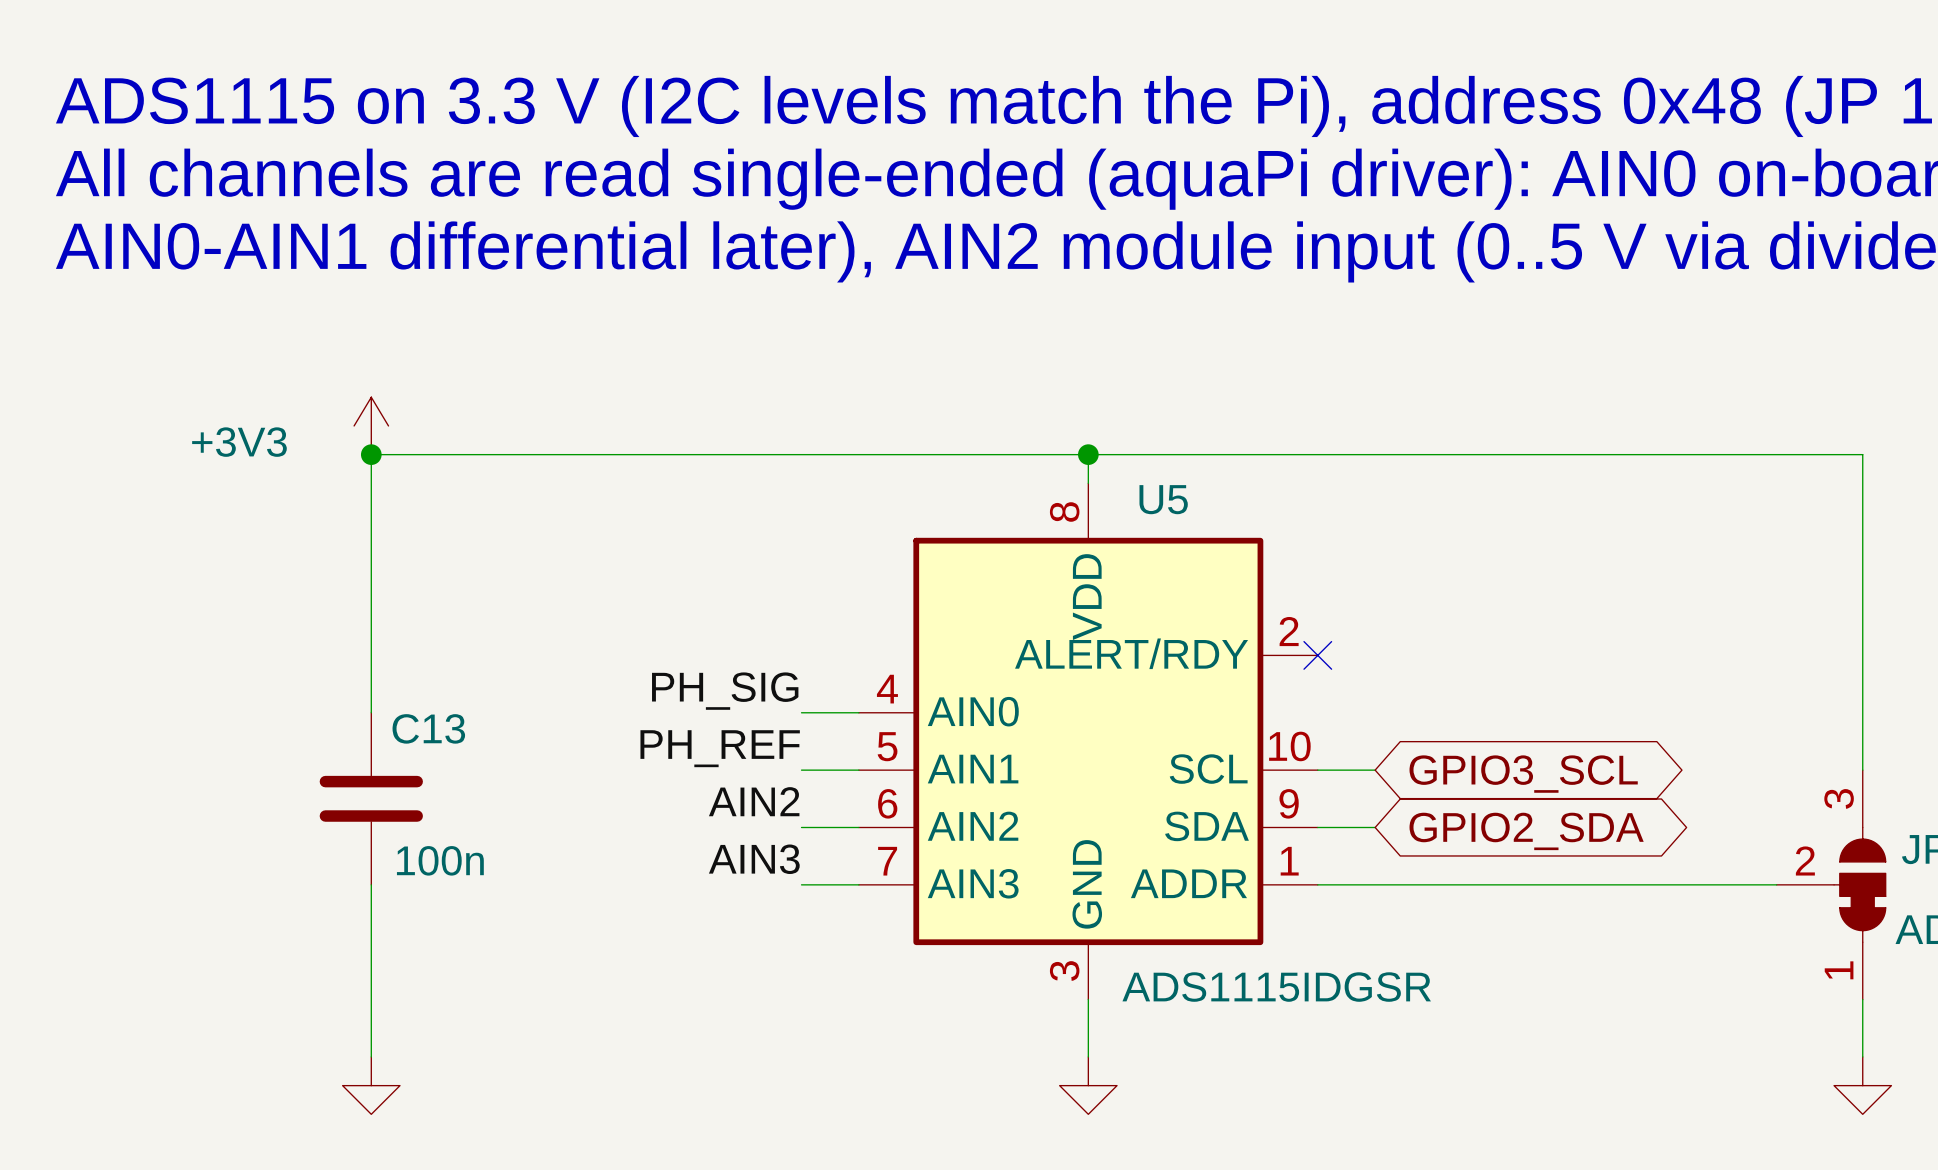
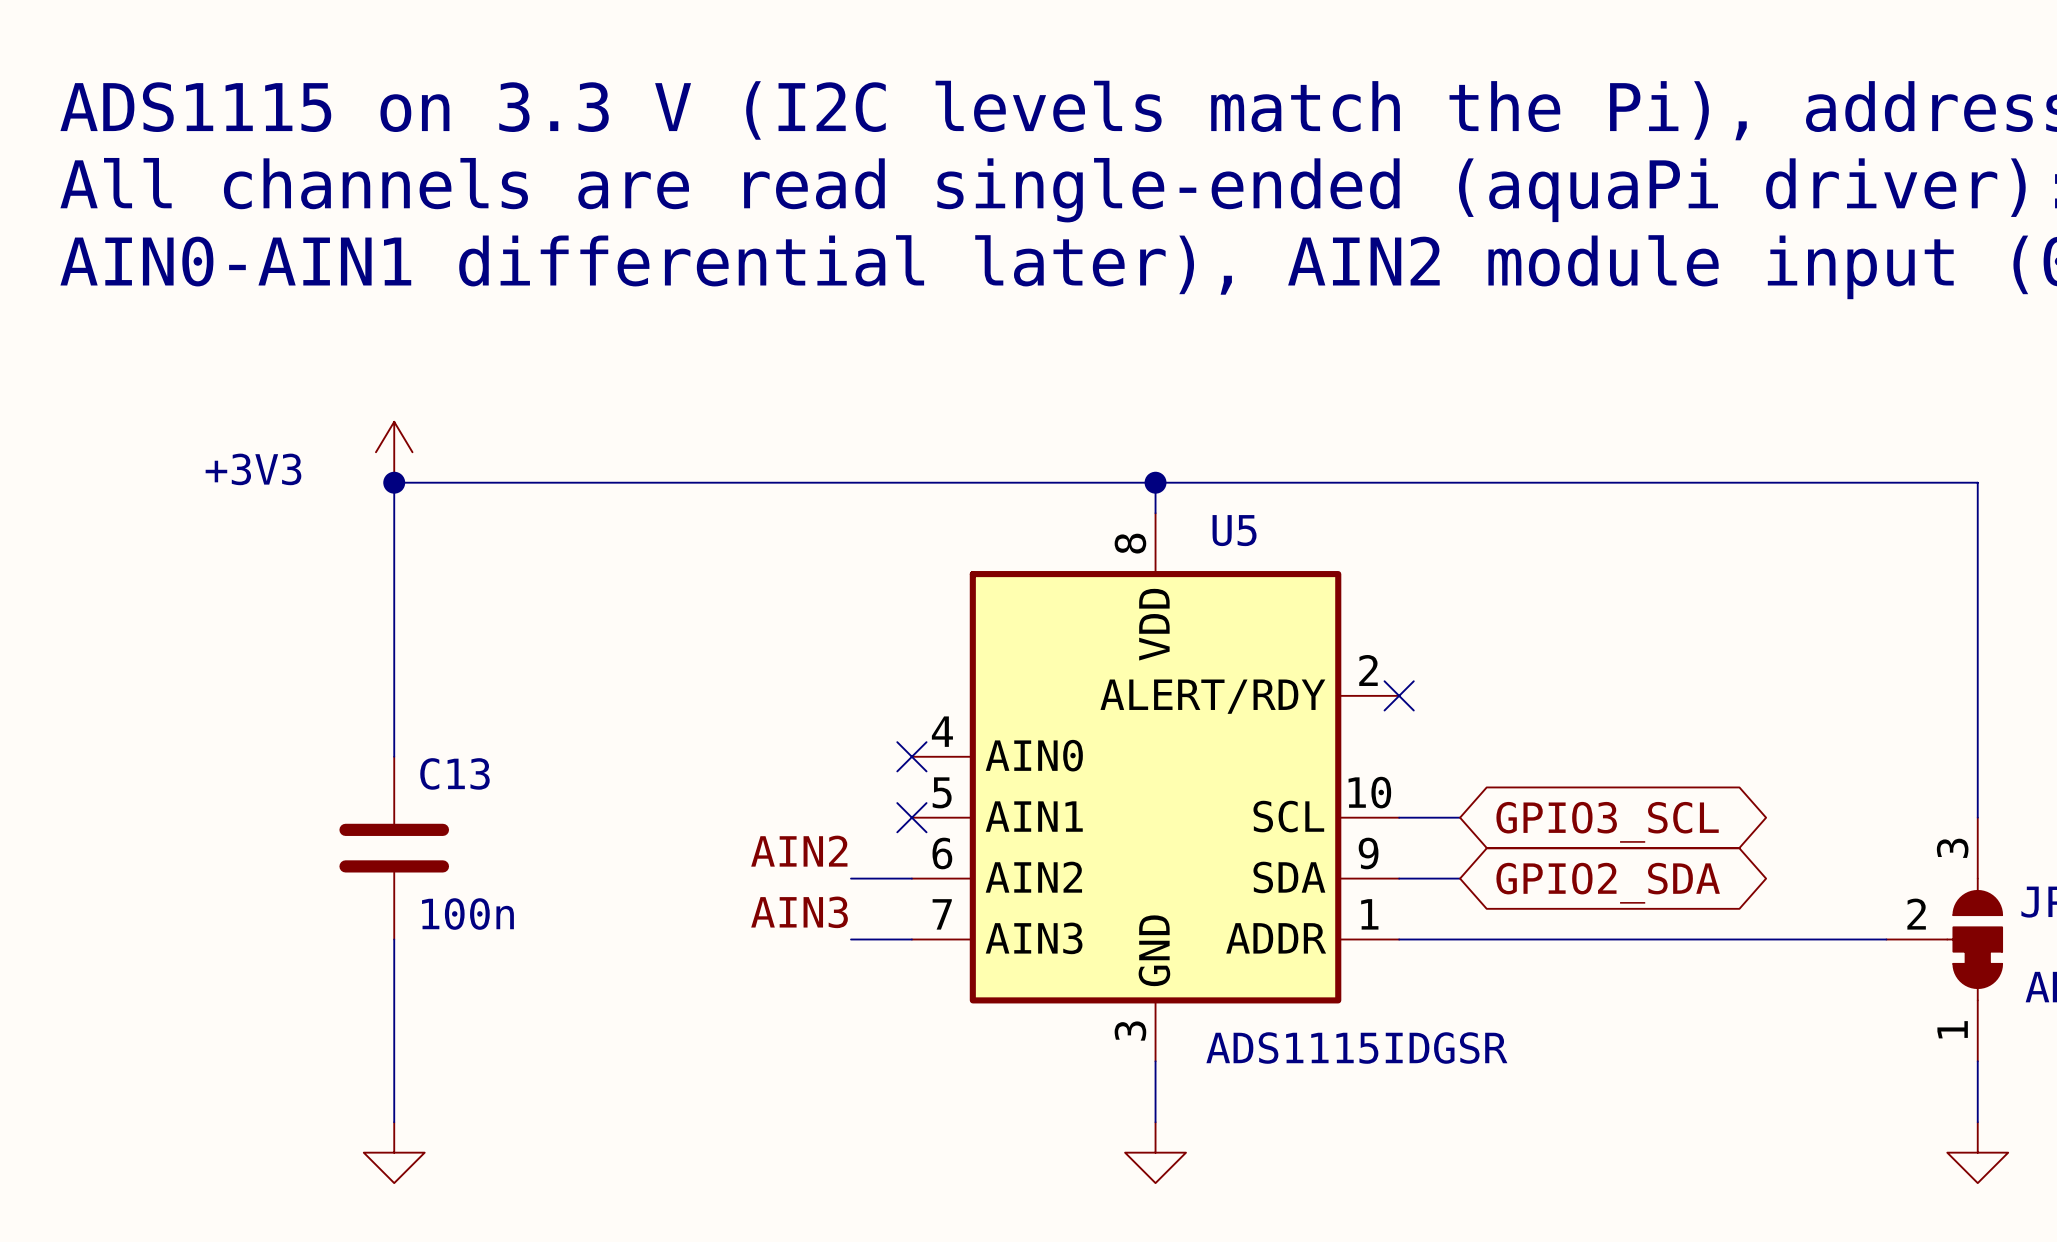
label: PH_SIG (725, 691) -> none
wire: (801, 712) (858, 712) -> none
no-connect mark: none -> (911, 756)
label: PH_REF (720, 748) -> none
wire: (801, 770) (858, 770) -> none
no-connect mark: none -> (911, 817)

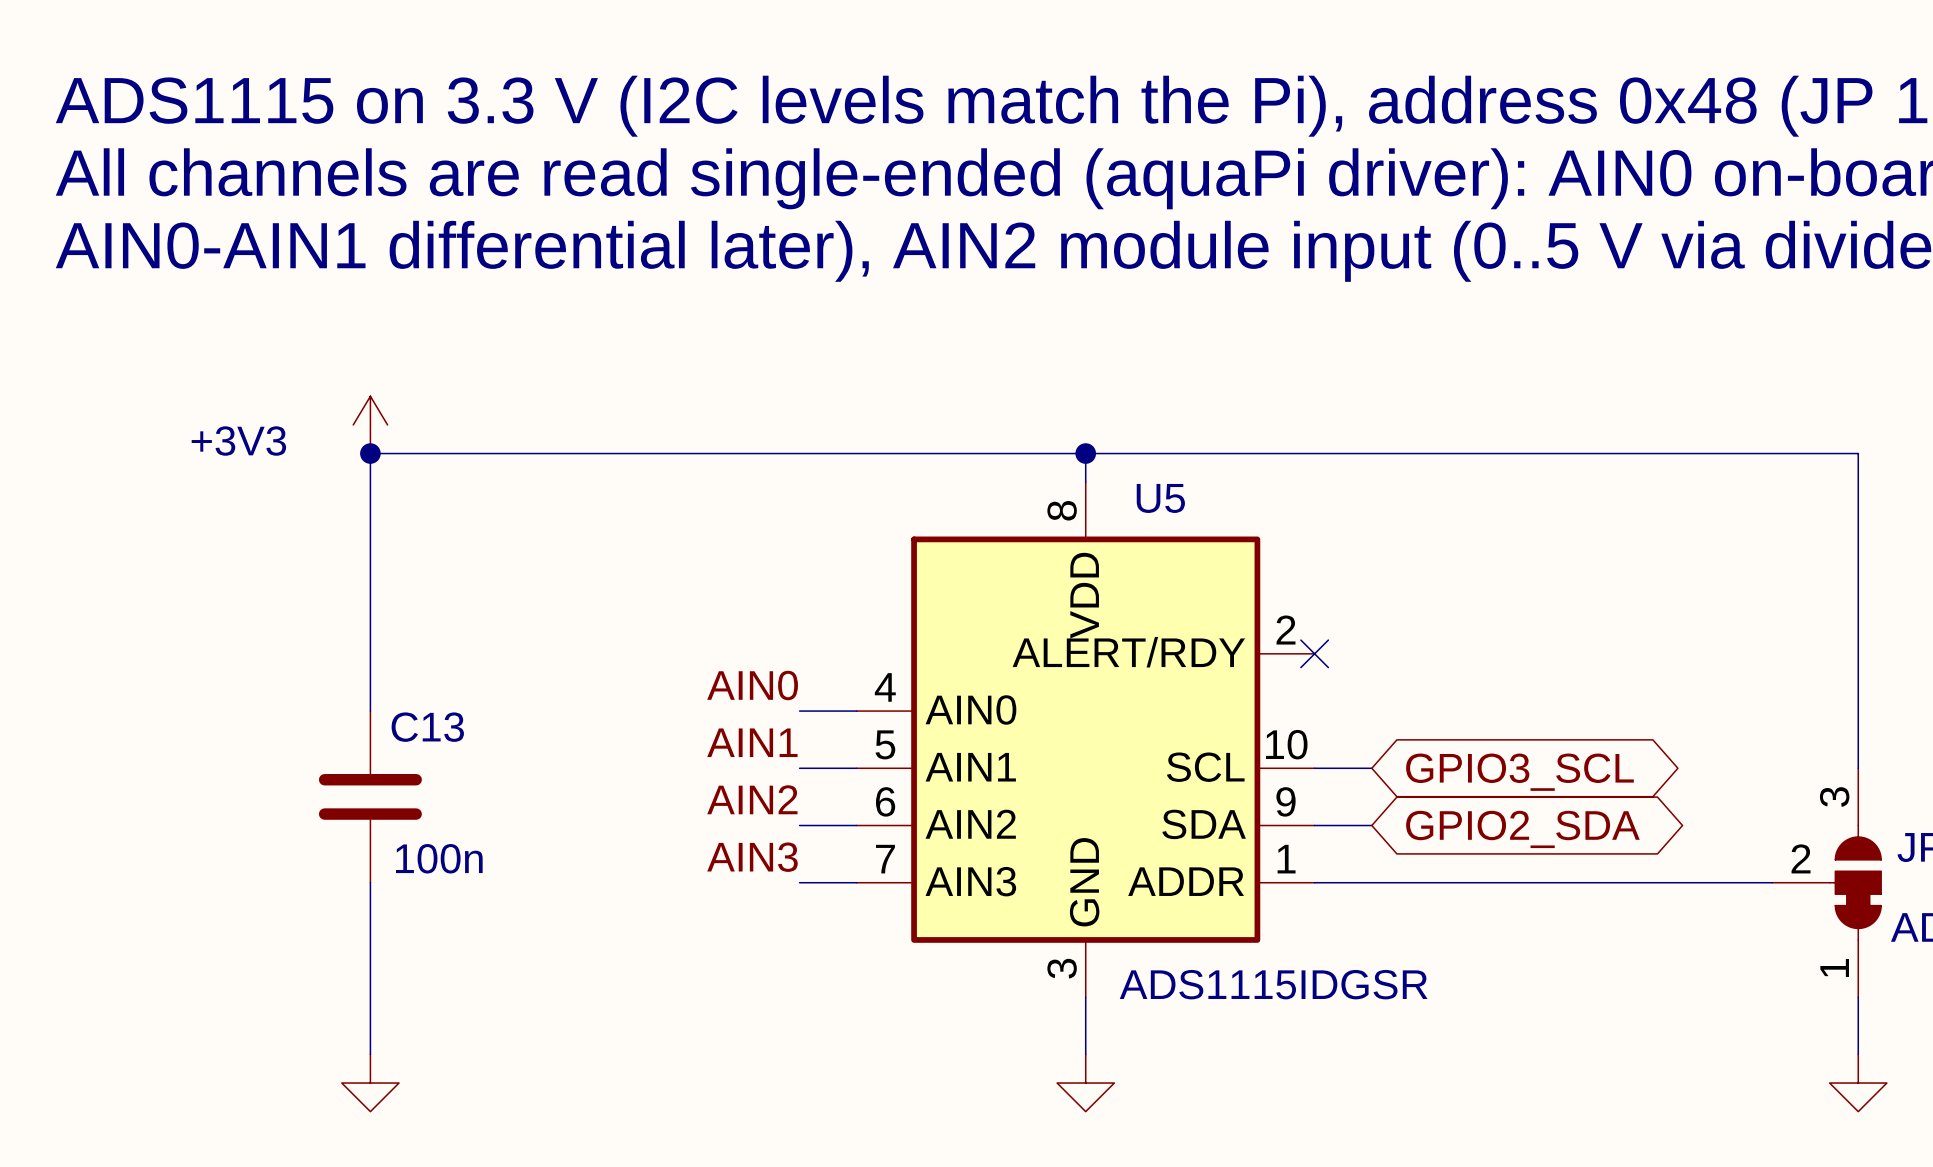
label: none -> AIN0 (752, 685)
wire: none -> (799, 711) (856, 711)
no-connect mark: (911, 756) -> none
label: none -> AIN1 (752, 742)
wire: none -> (799, 768) (856, 768)
no-connect mark: (911, 817) -> none

